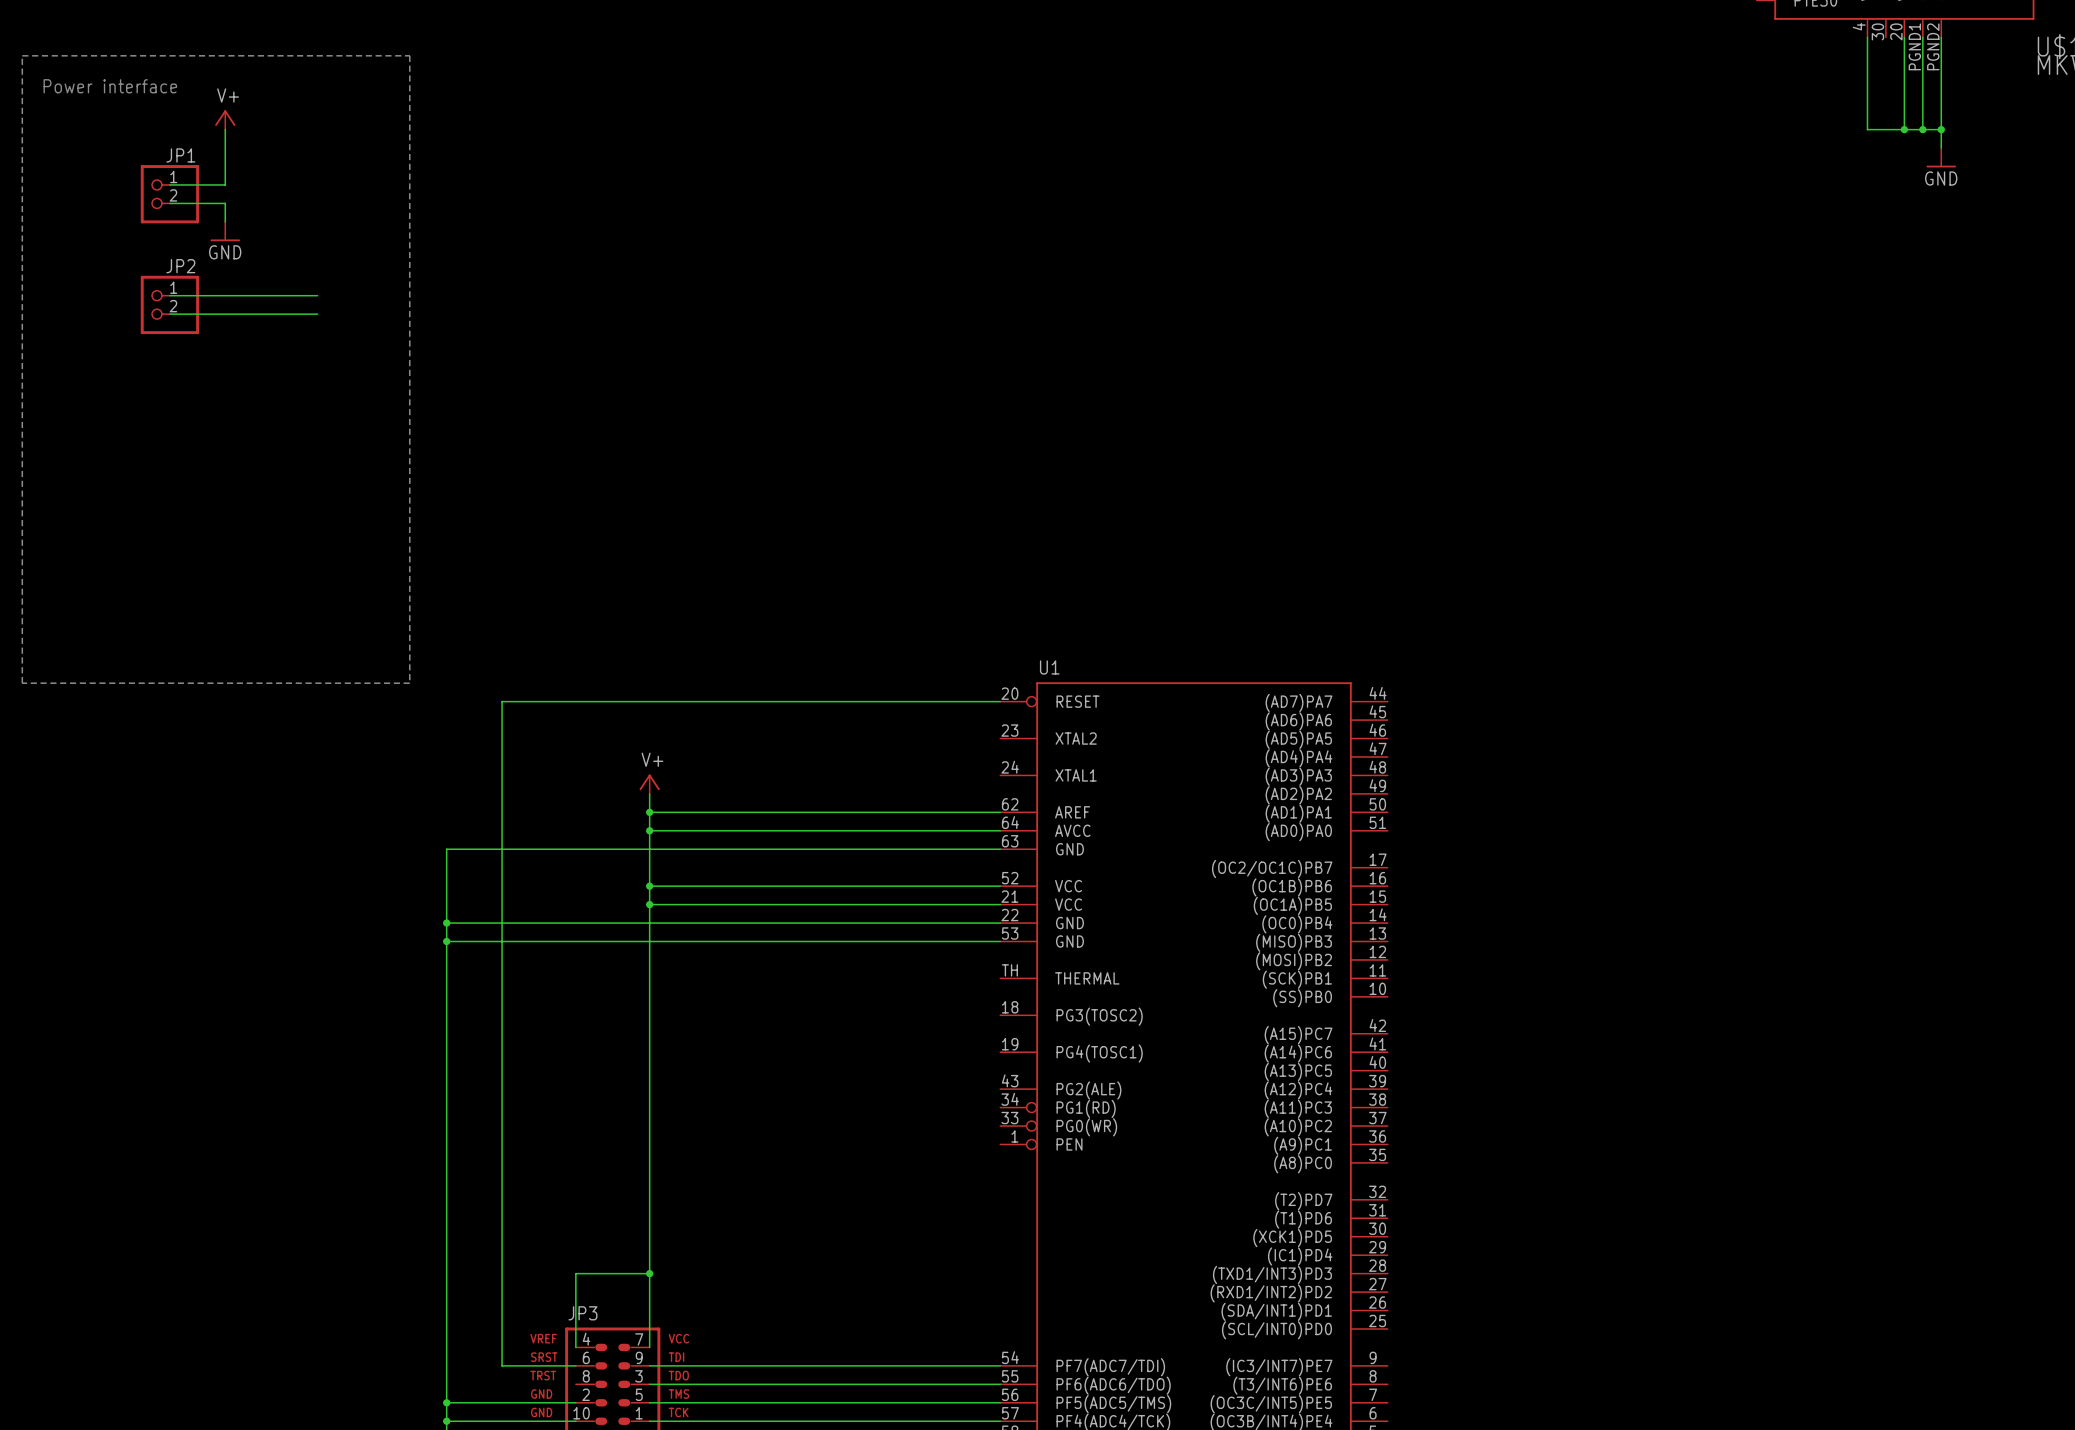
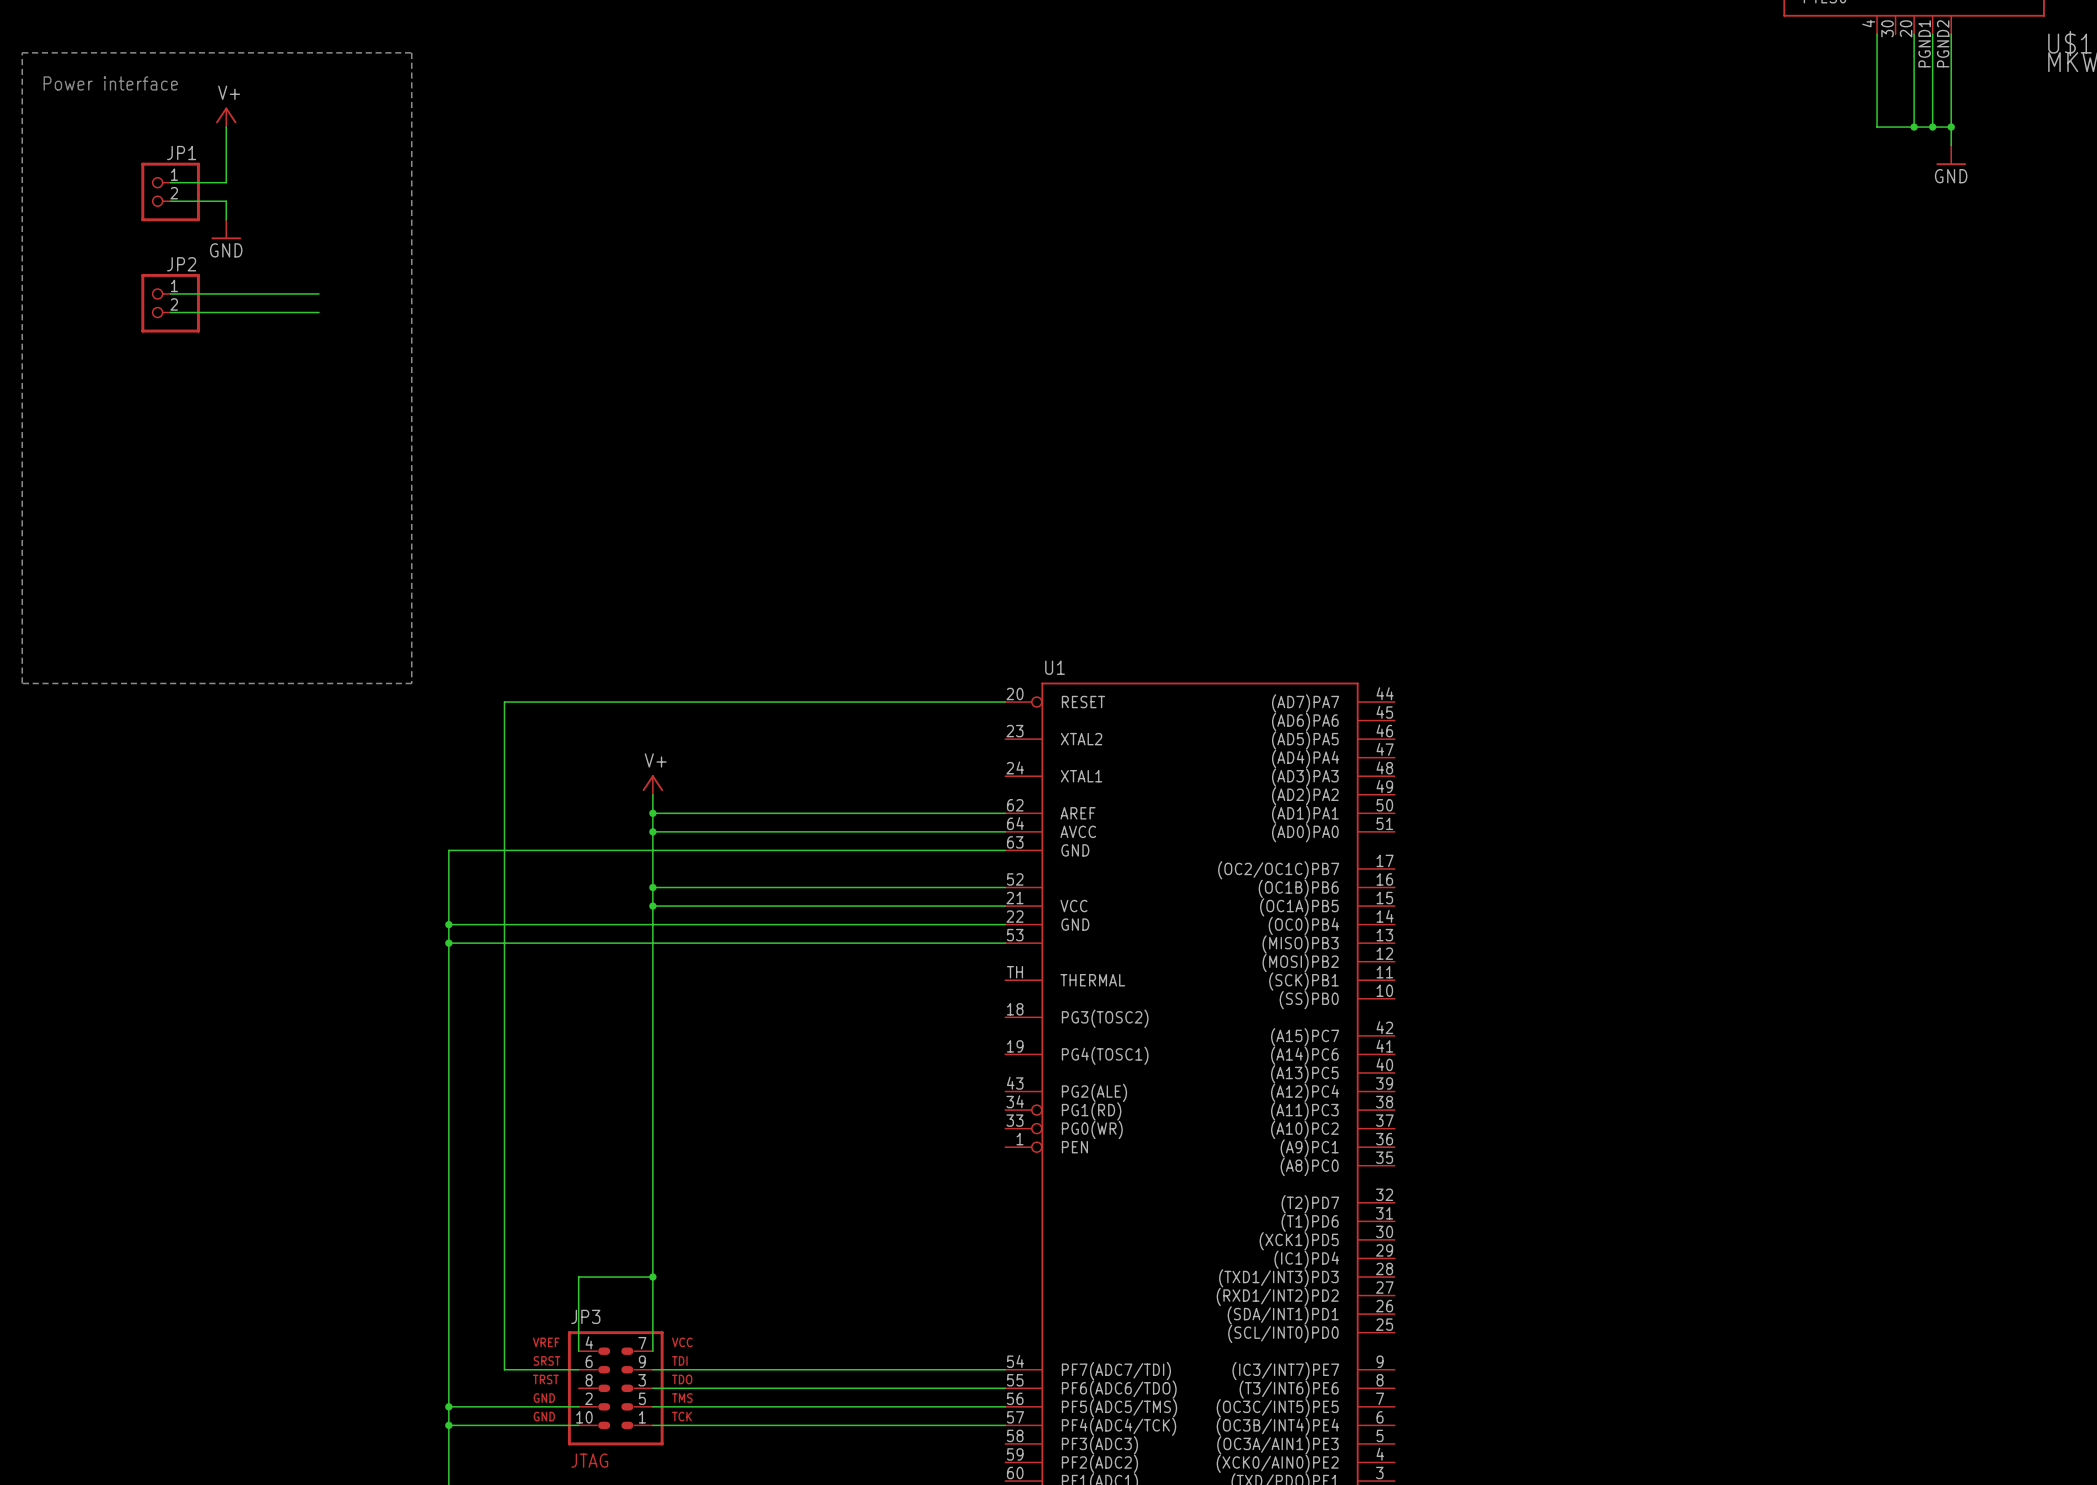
U1 pin name: VCC (1068, 886) -> none
U1 pin name: GND (1069, 941) -> none

